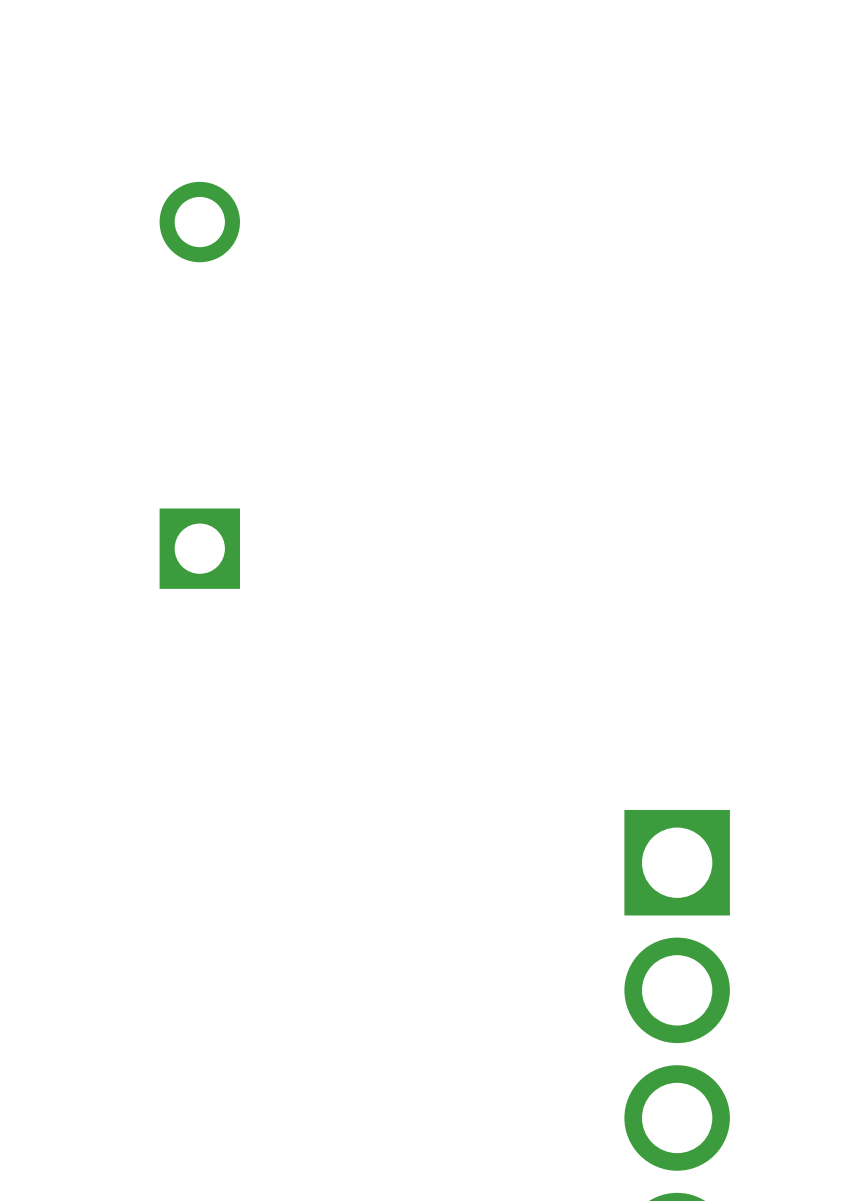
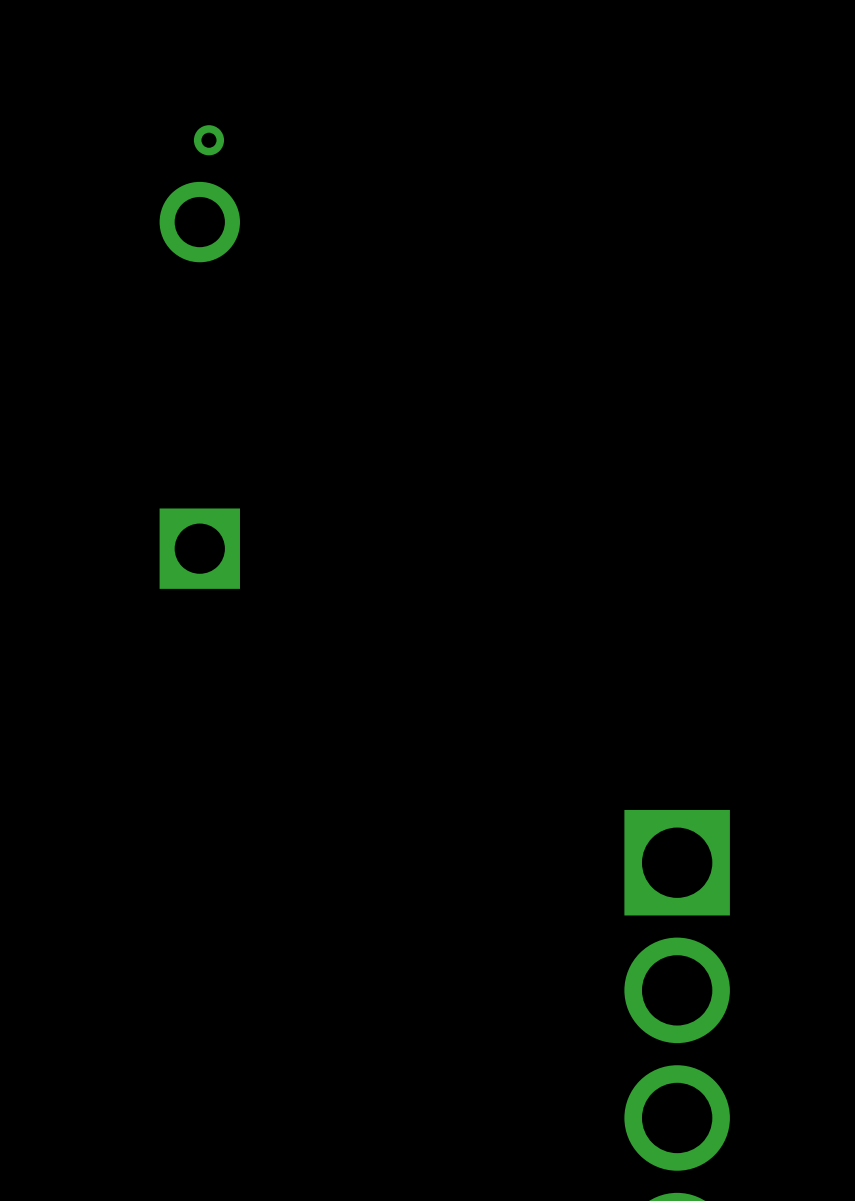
via: none -> (208, 140)

